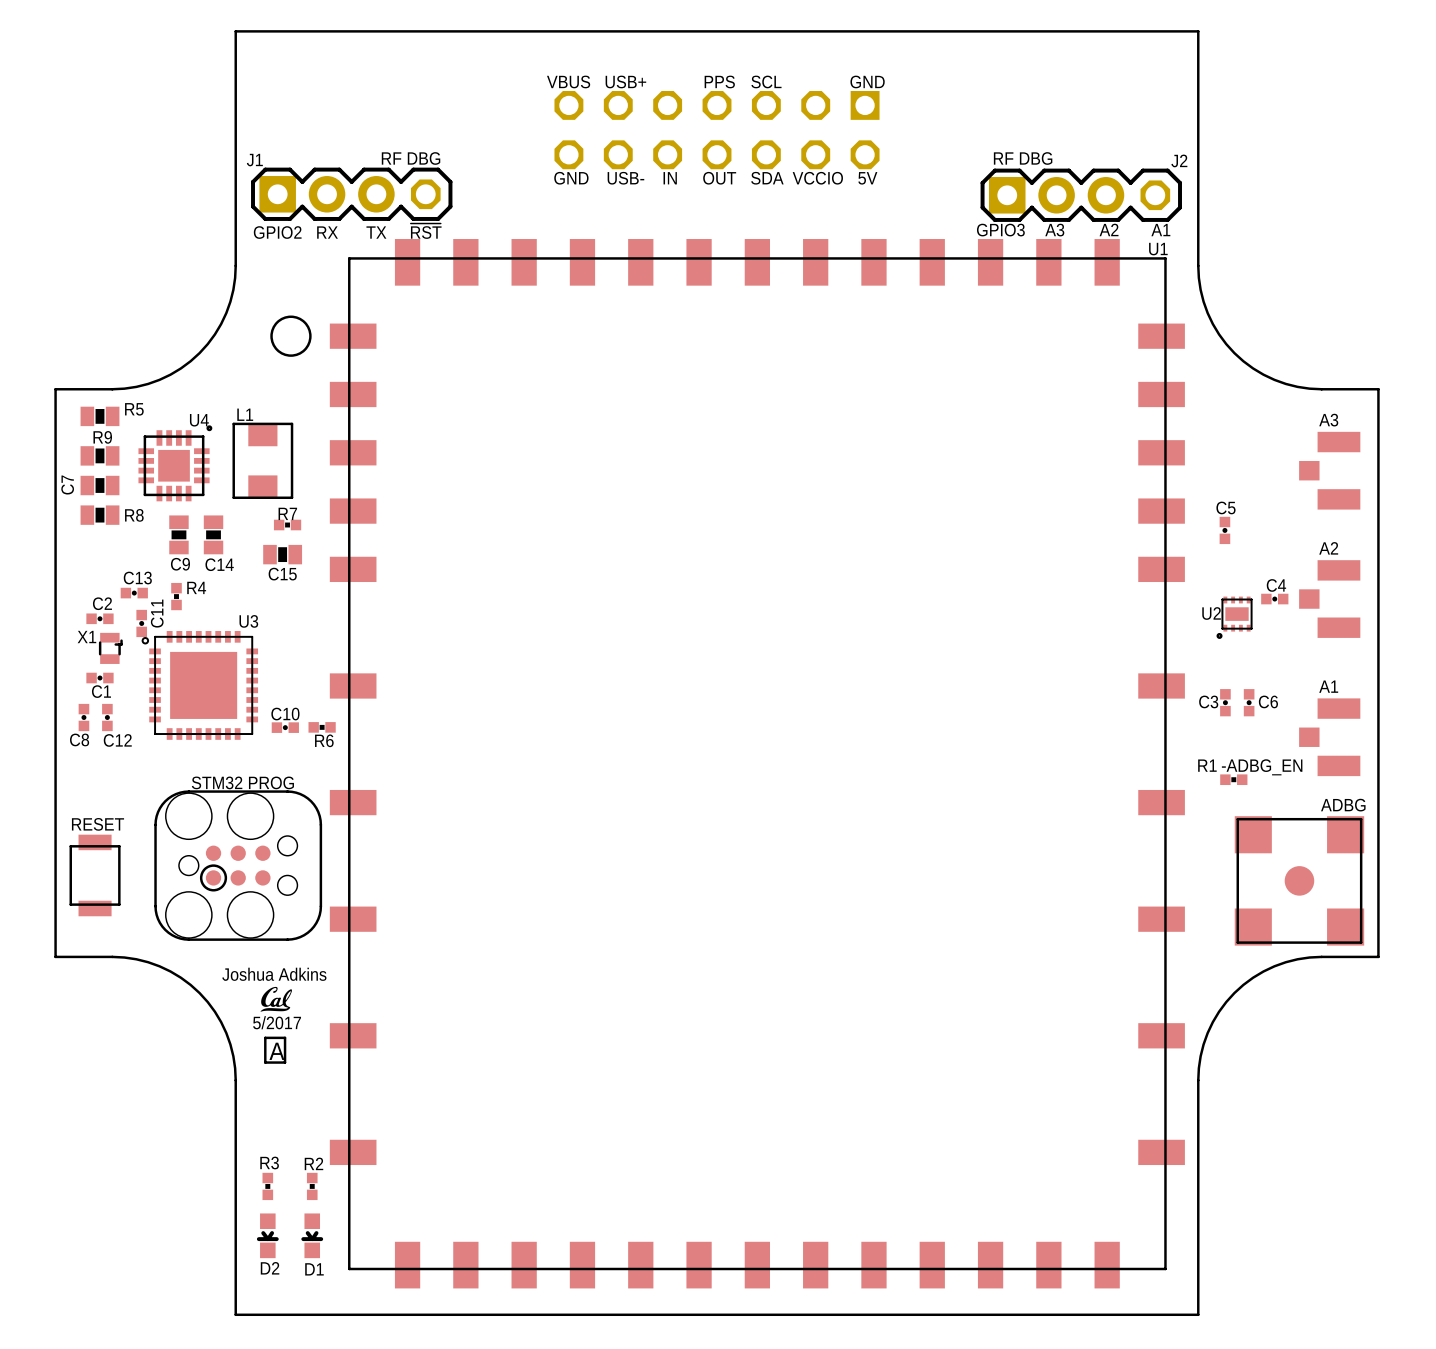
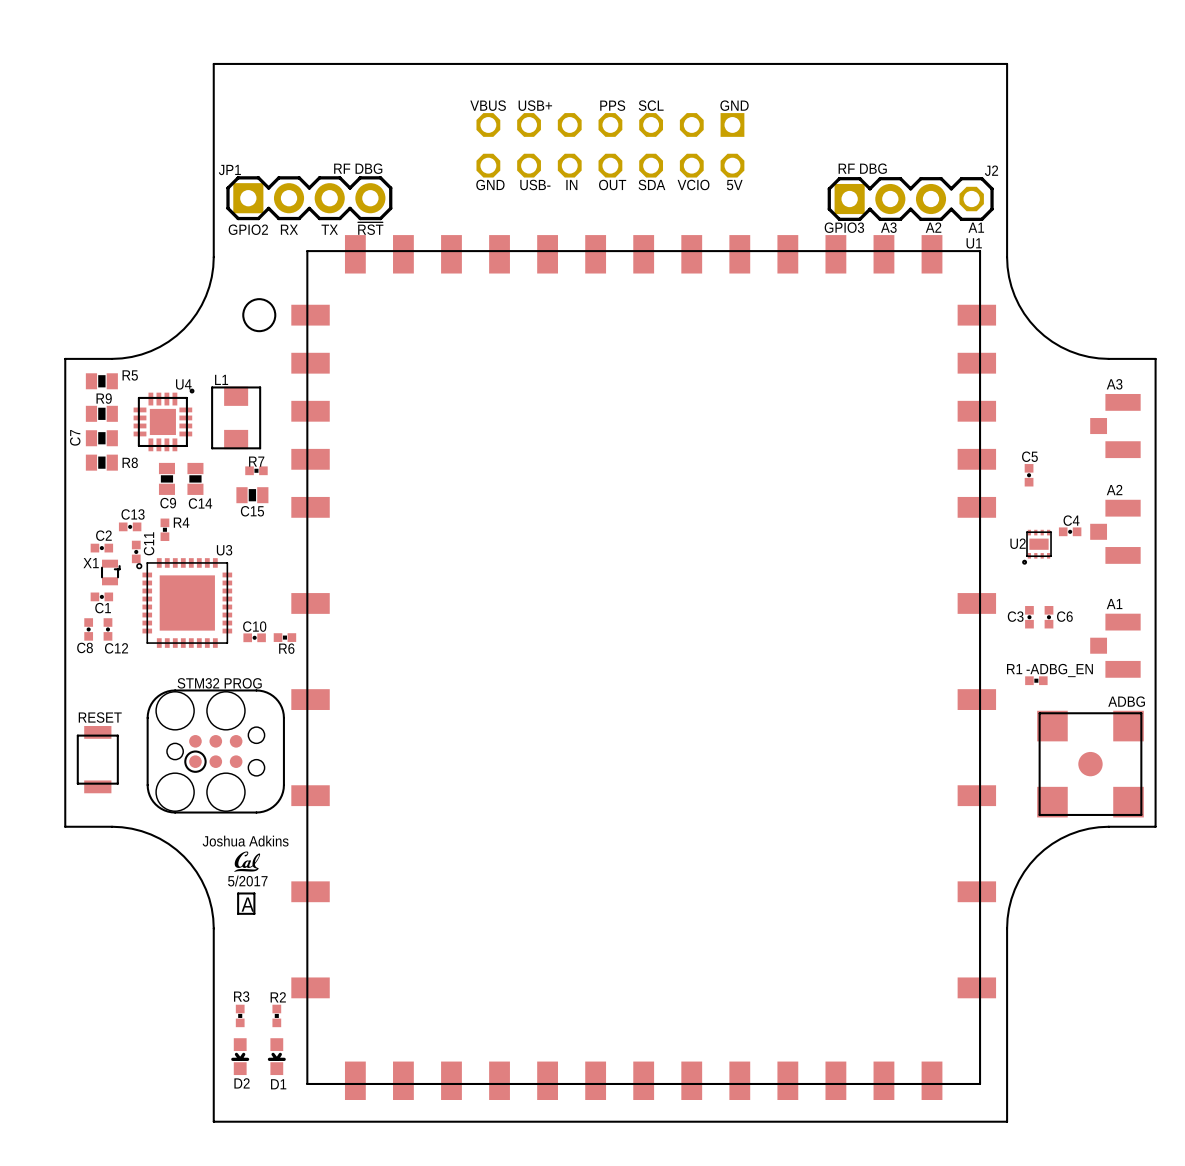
text: VCCIO (817, 178) -> VCIO (693, 184)
J1: (351, 194) -> none
JP1: none -> (309, 198)

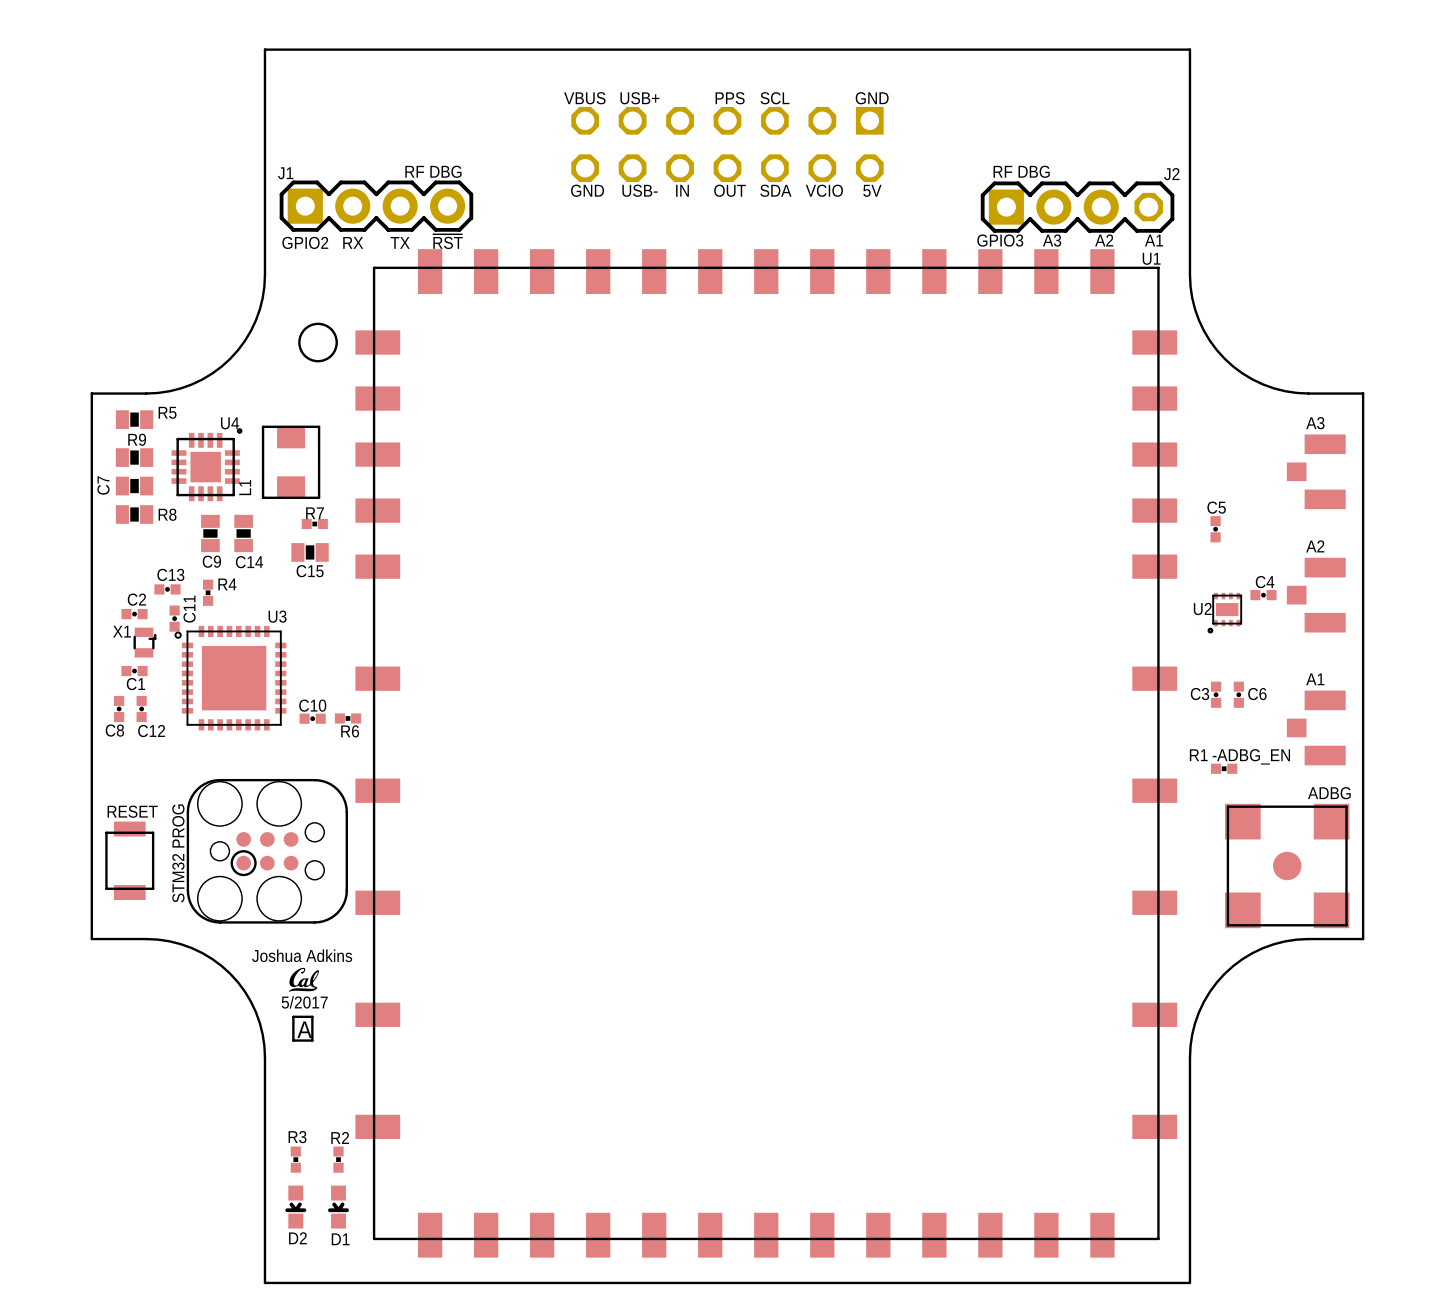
JP1 name: JP1 (229, 170) -> J1 (285, 173)
L1 name rotation: 0° (221, 379) -> 90° counterclockwise (245, 487)
L1 name position: L1 (221, 379) -> L1 (245, 487)
text rotation: 0° (219, 683) -> 90° counterclockwise (178, 853)
text position: STM32 PROG (219, 683) -> STM32 PROG (178, 853)

